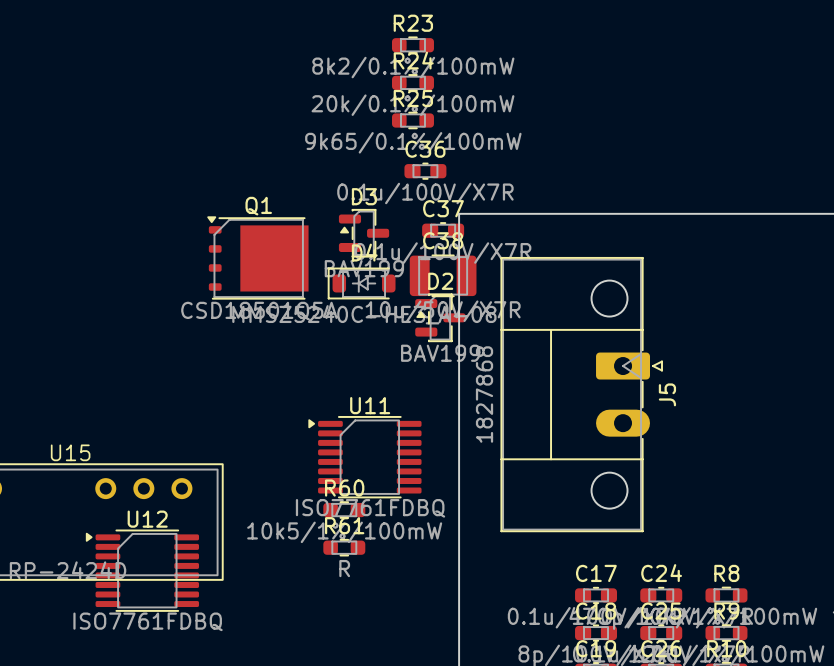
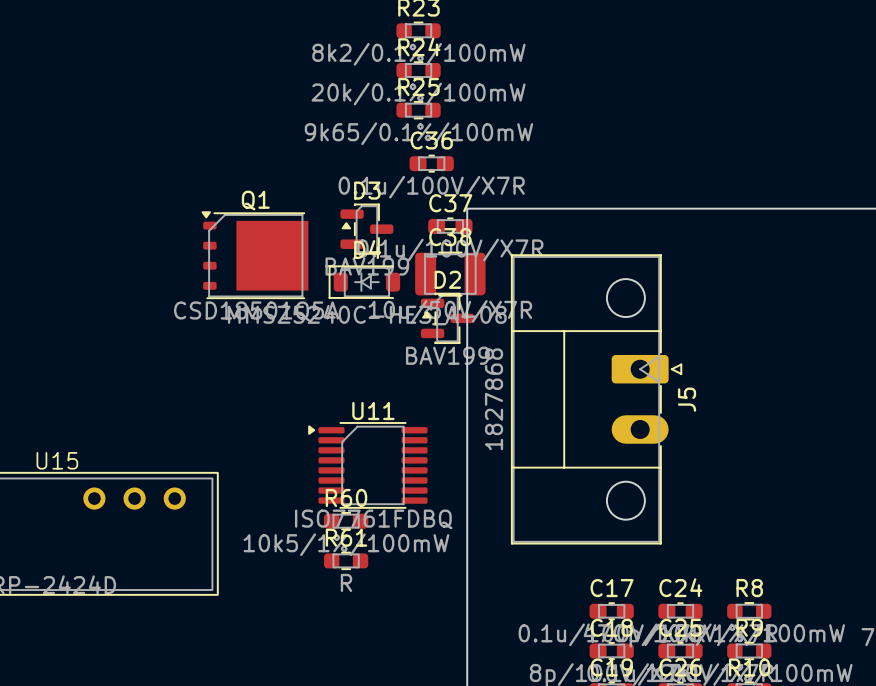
U12: ISO7761FDBQ (142, 570) -> none

